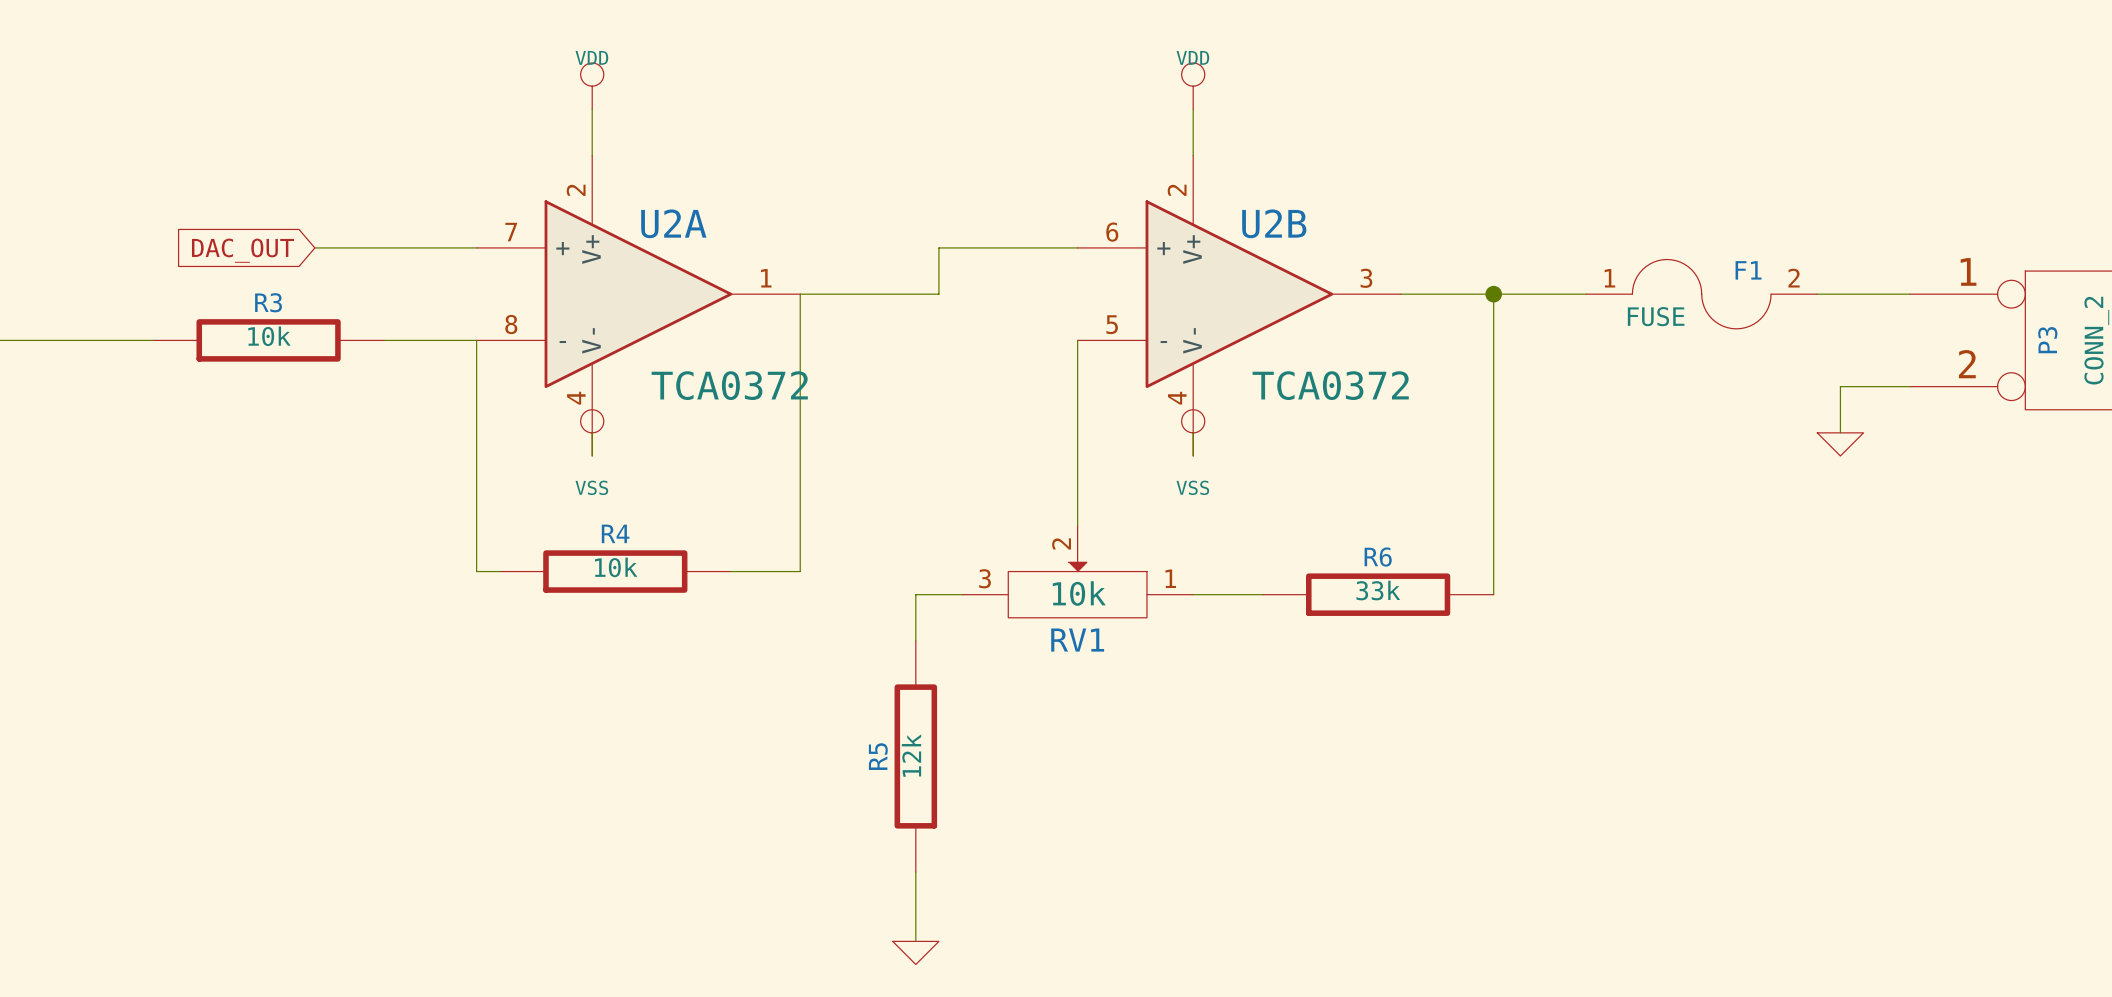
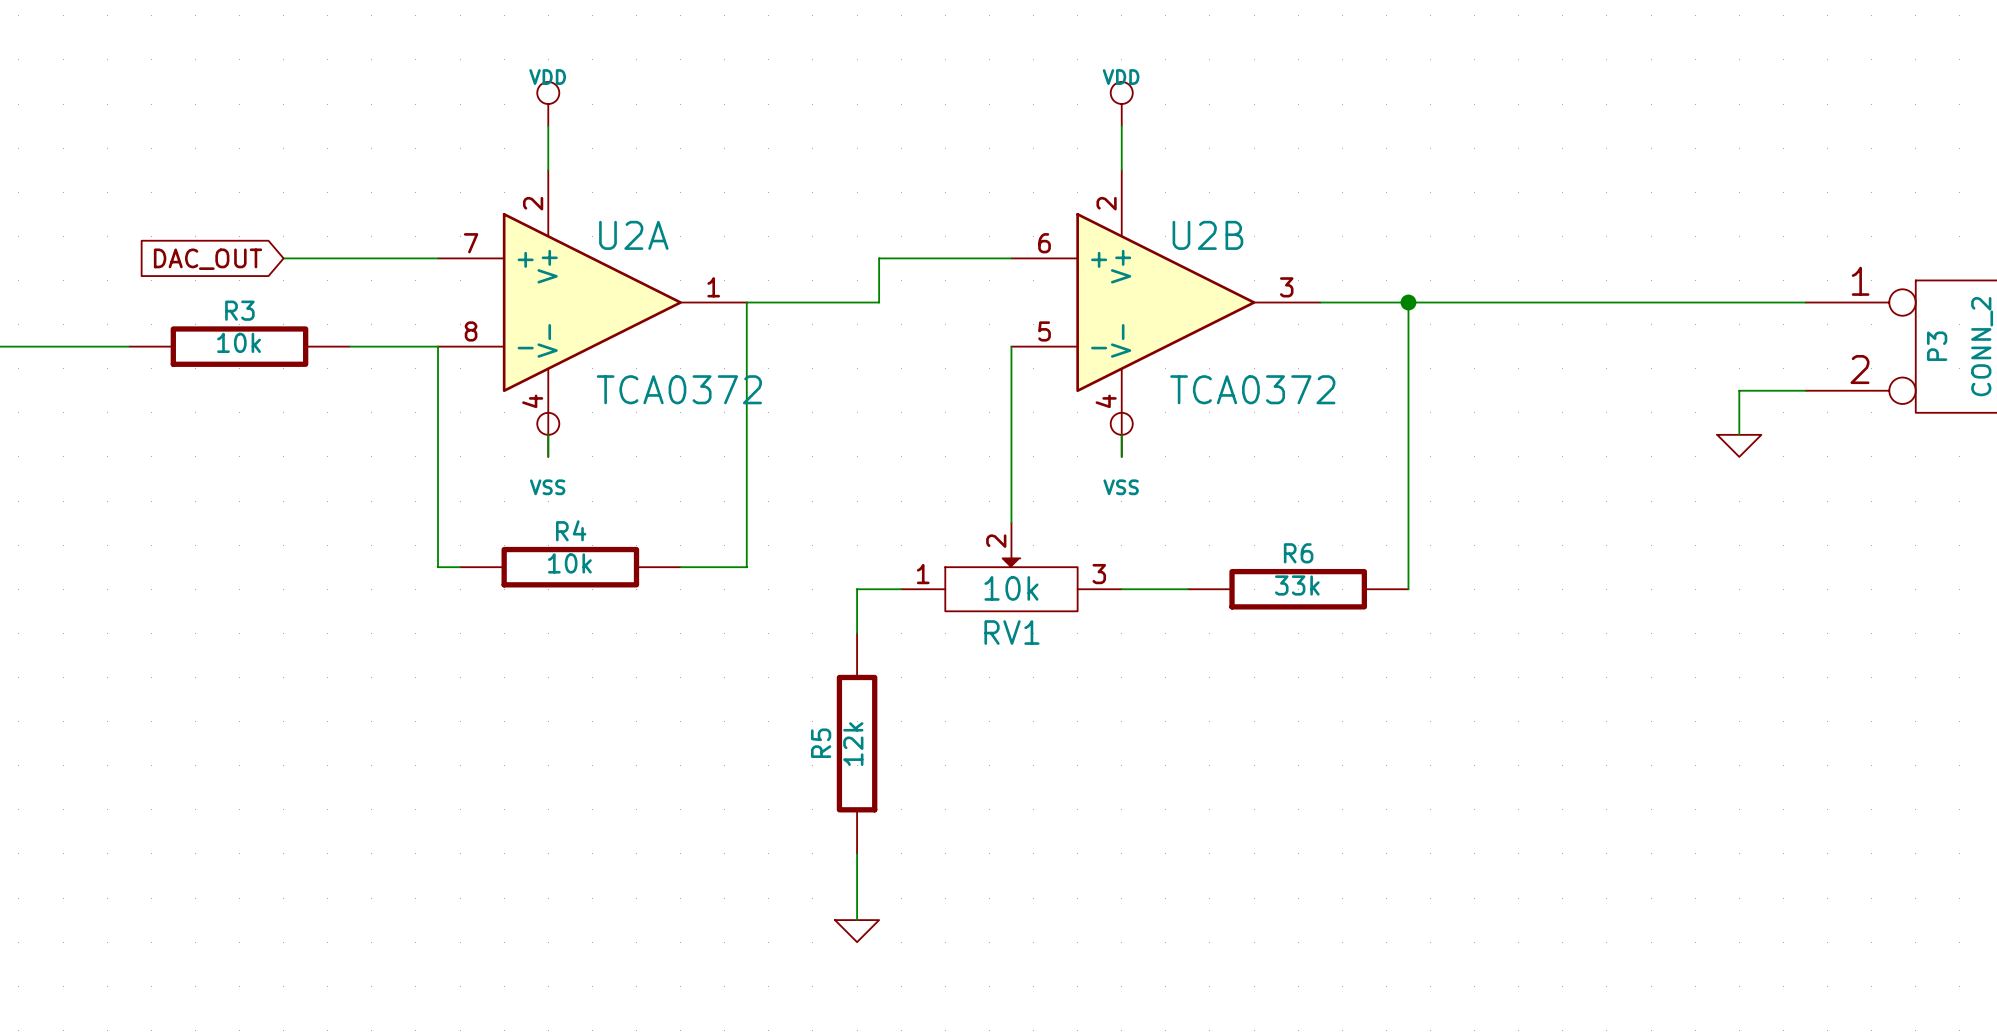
wire: none -> (1496, 302) (1717, 302)
F1: FUSE (1701, 294) -> none
RV1 flip: as is (1077, 590) -> left-right (1011, 584)

